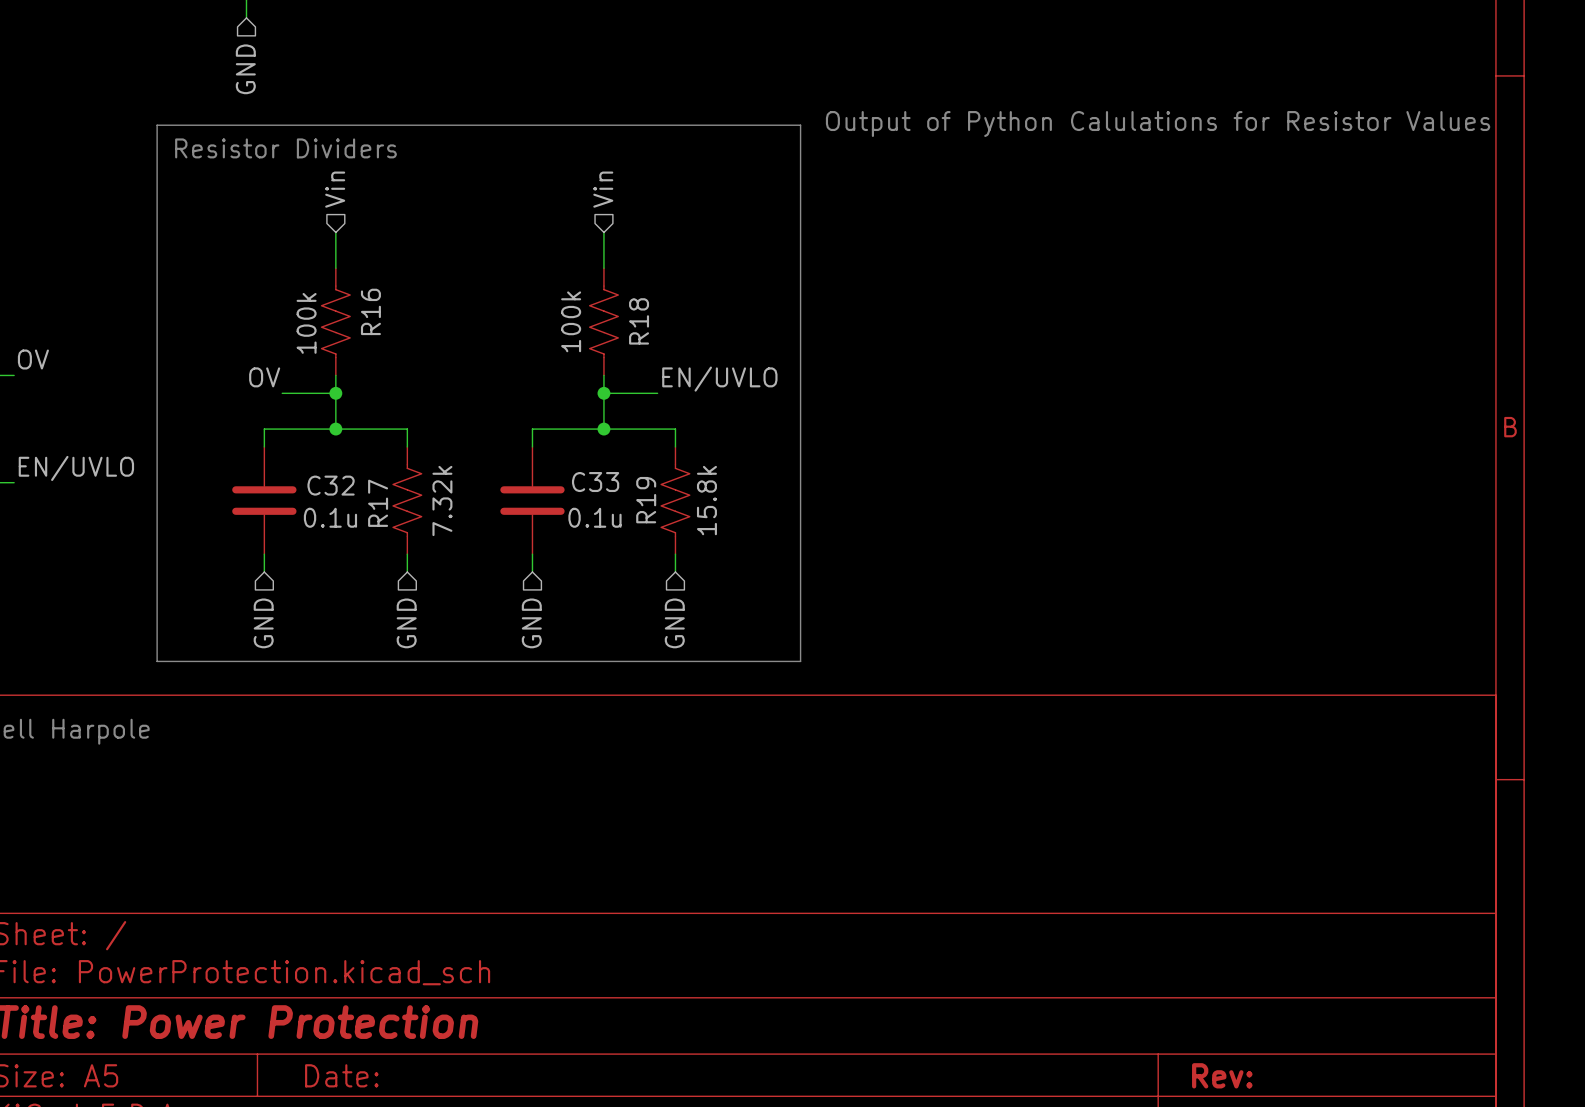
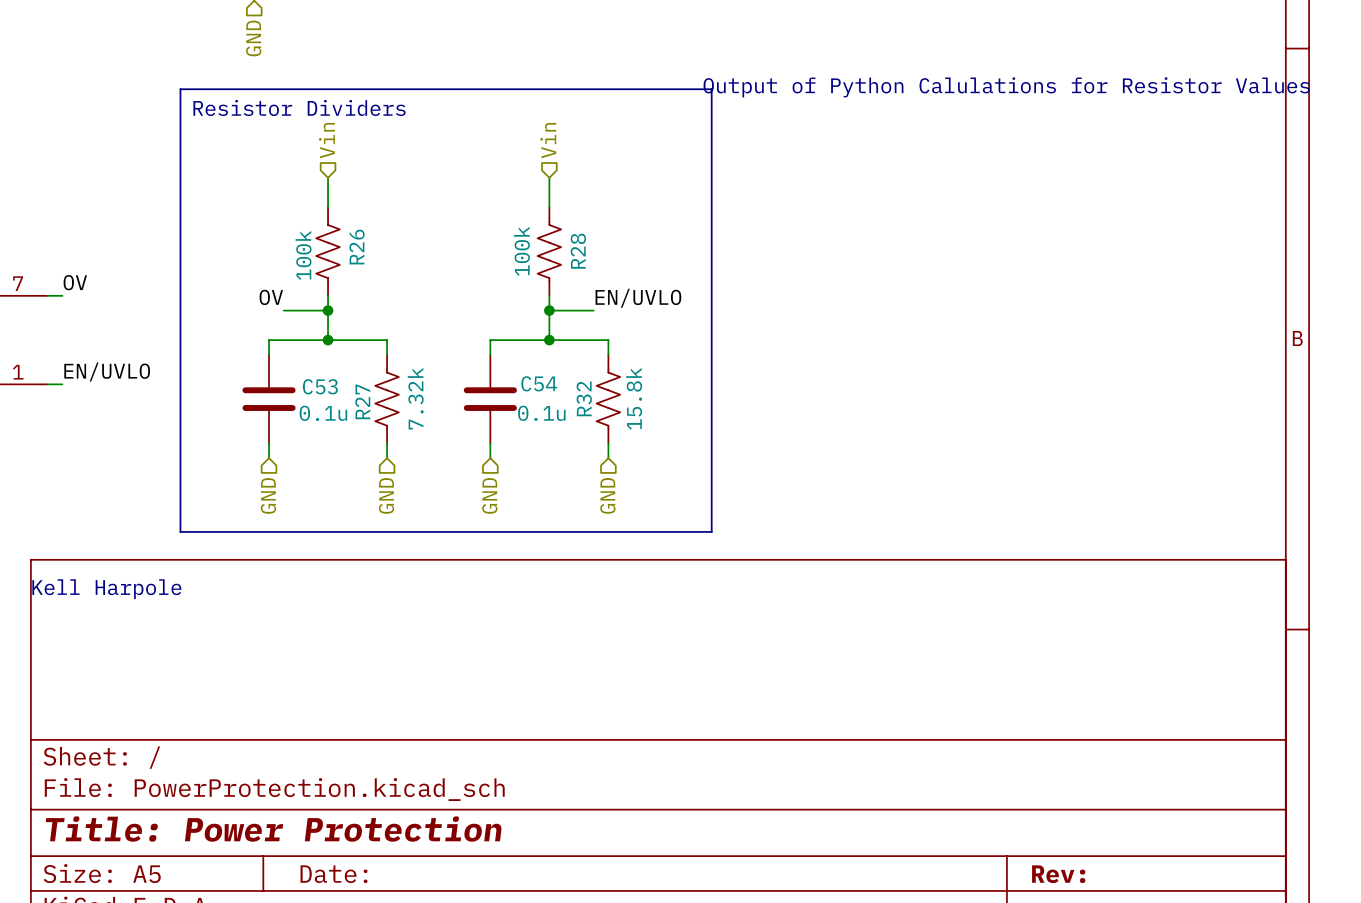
R16 name: R16 (370, 311) -> R26 (356, 247)
R18 name: R18 (639, 321) -> R28 (578, 251)
C33 name: C33 (595, 482) -> C54 (539, 383)
C32 name: C32 (331, 485) -> C53 (320, 386)
R19 name: R19 (646, 500) -> R32 (584, 398)
R17 name: R17 (378, 503) -> R27 (362, 401)

